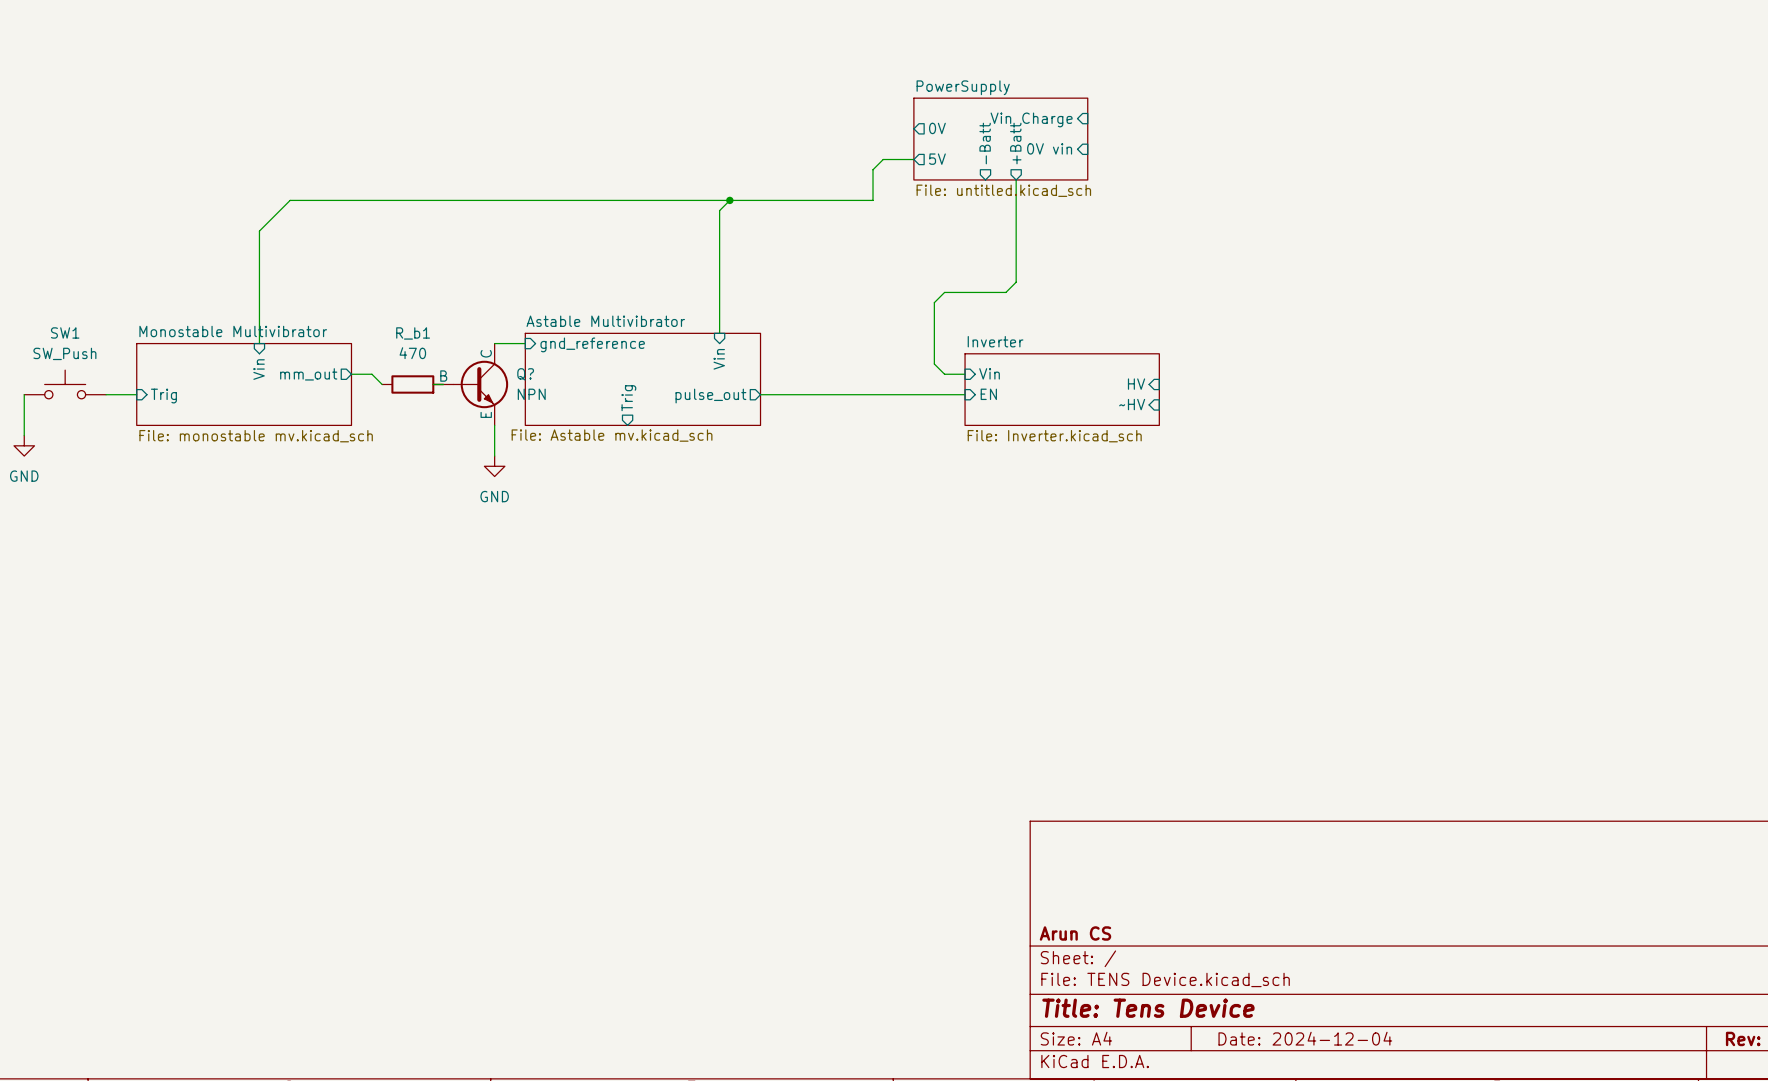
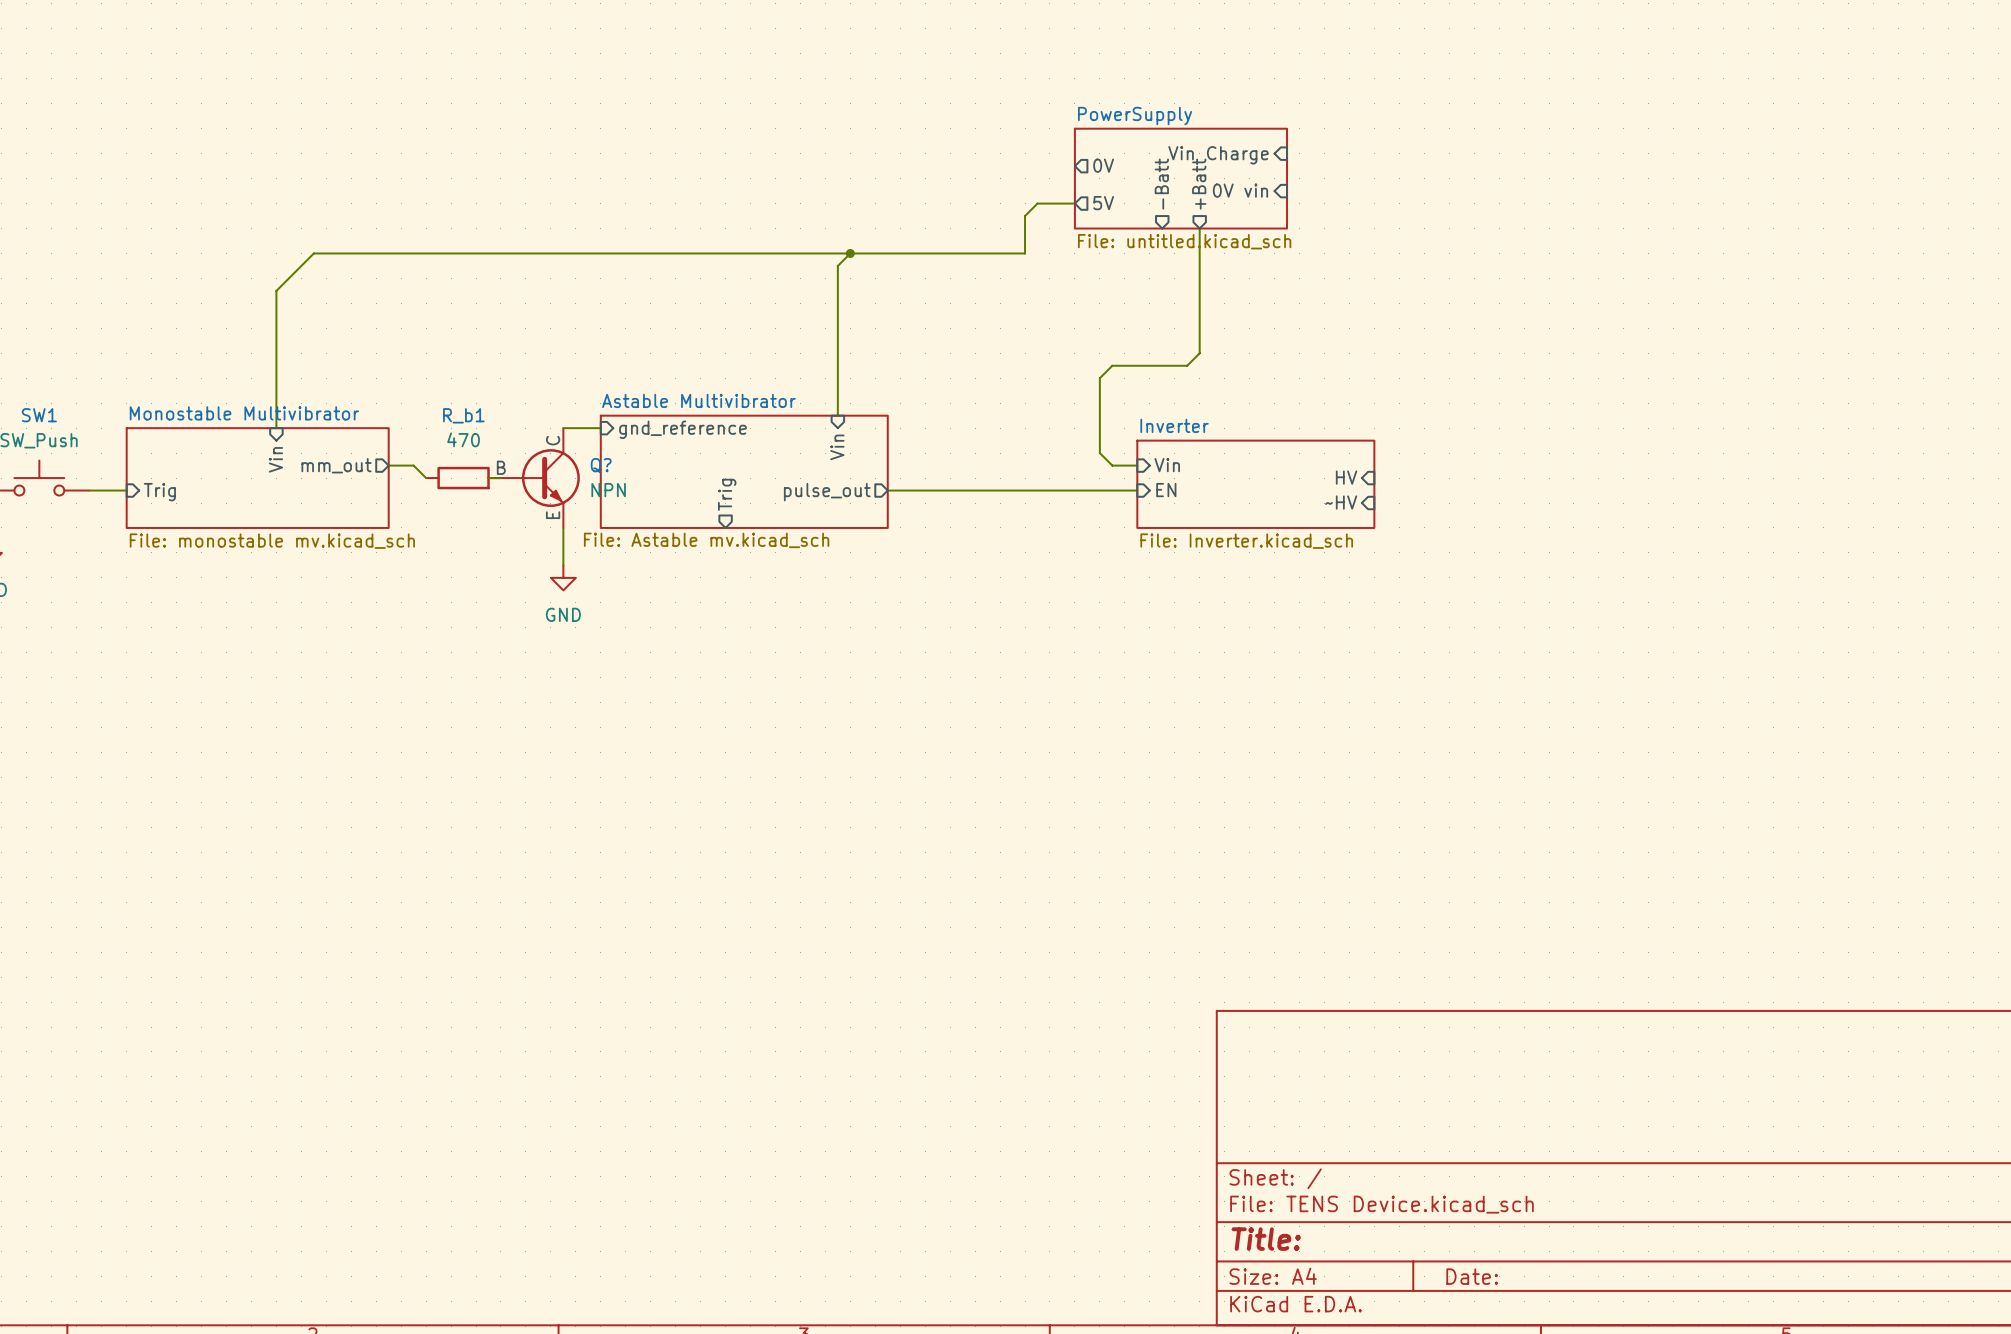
title block: Arun CS (1075, 933) -> none
title block: Title: Tens Device (1148, 1008) -> Title: (1266, 1239)
title block: Date: 2024-12-04 (1305, 1038) -> Date: (1472, 1276)

